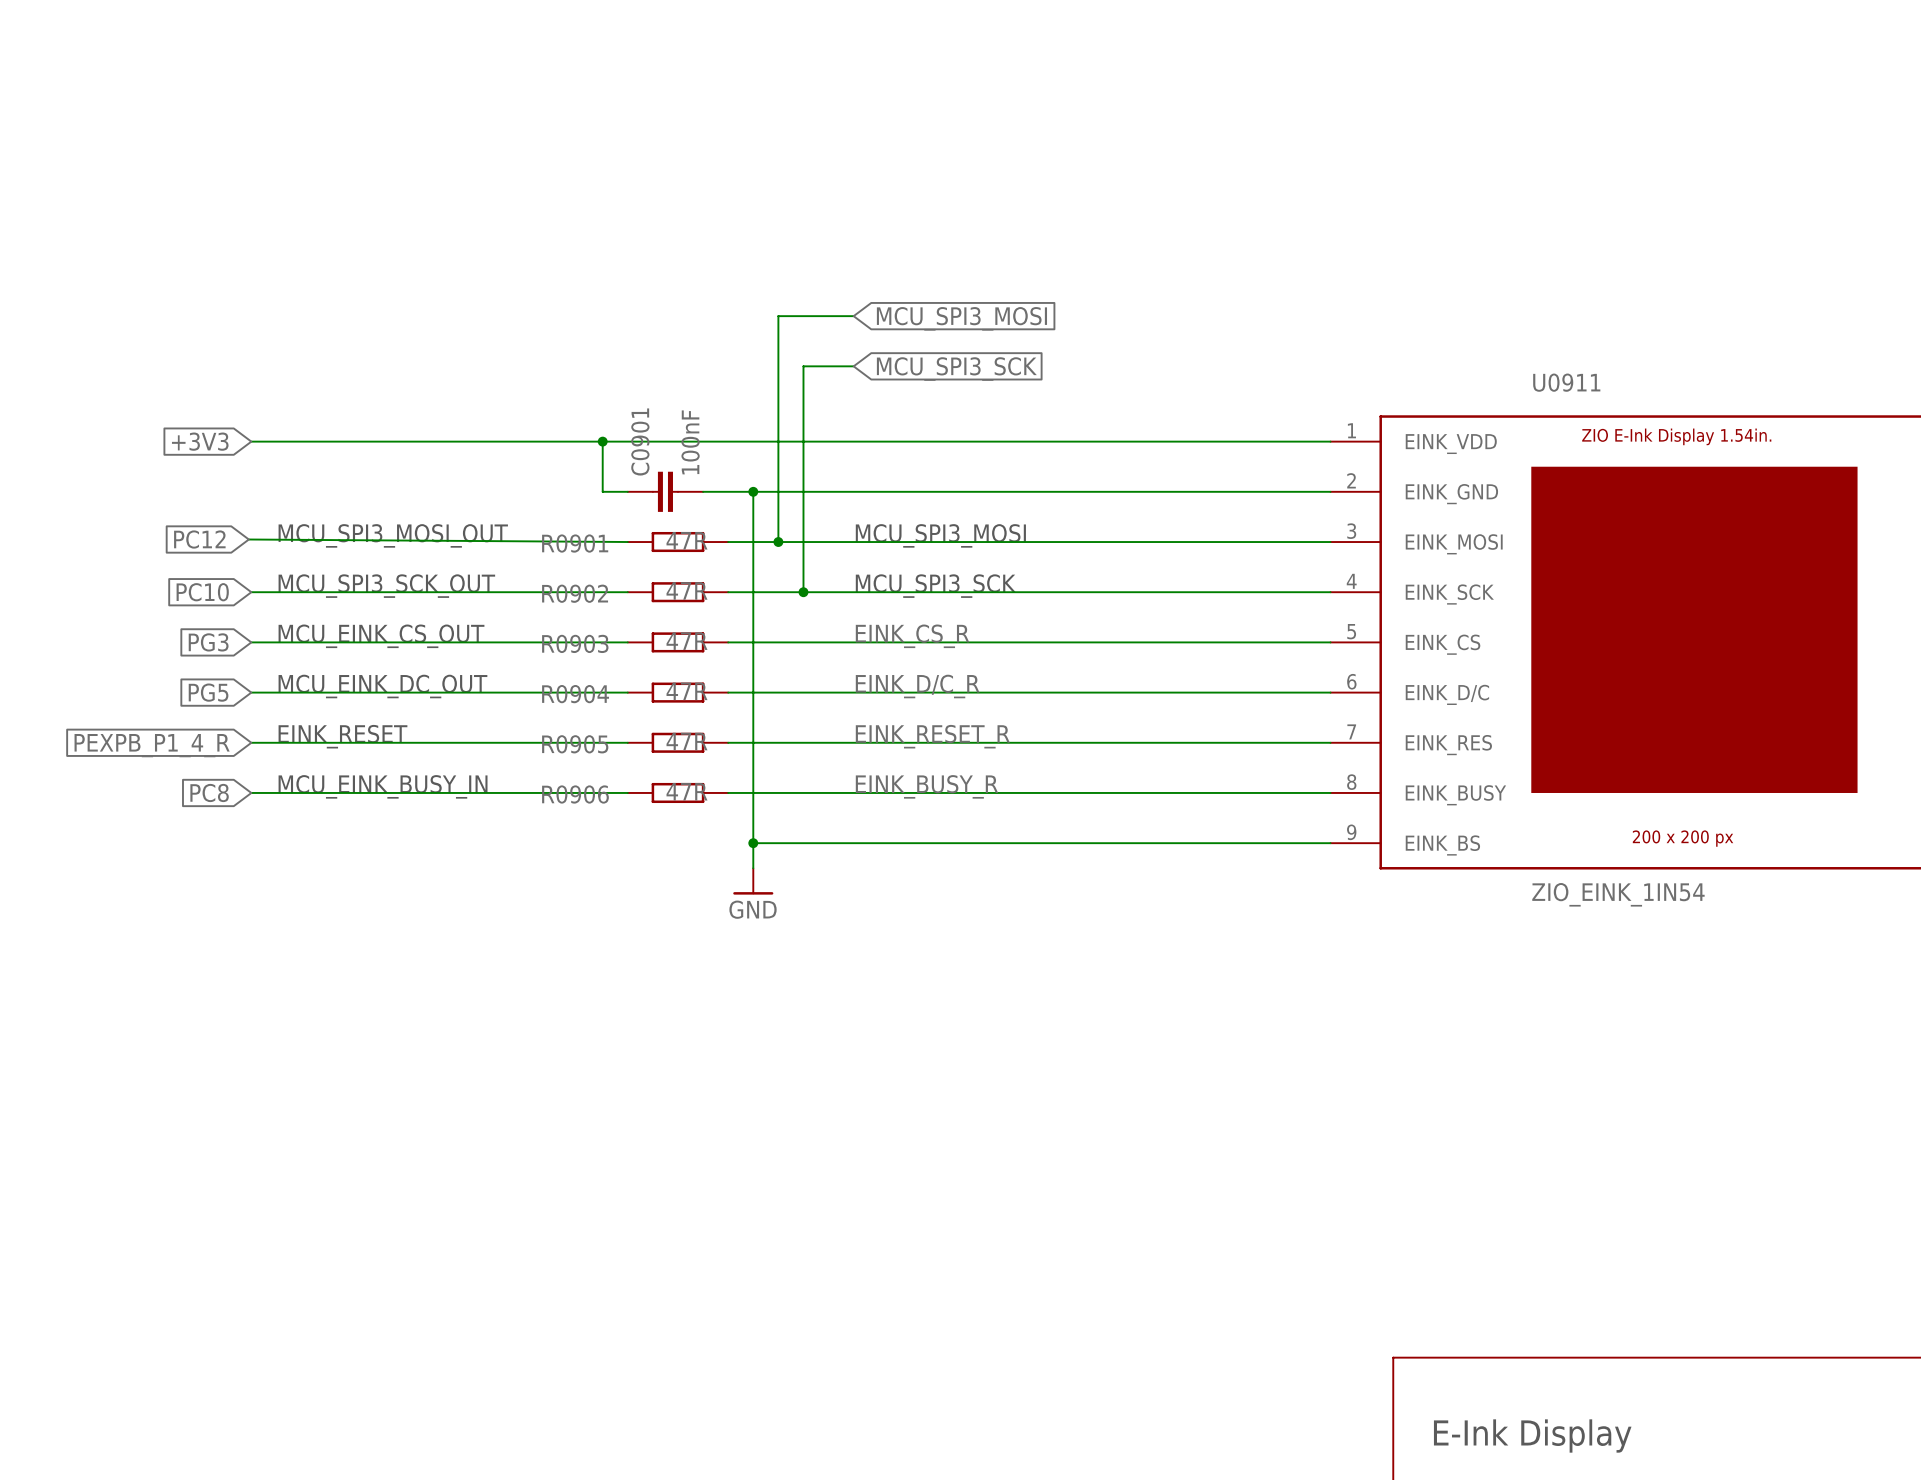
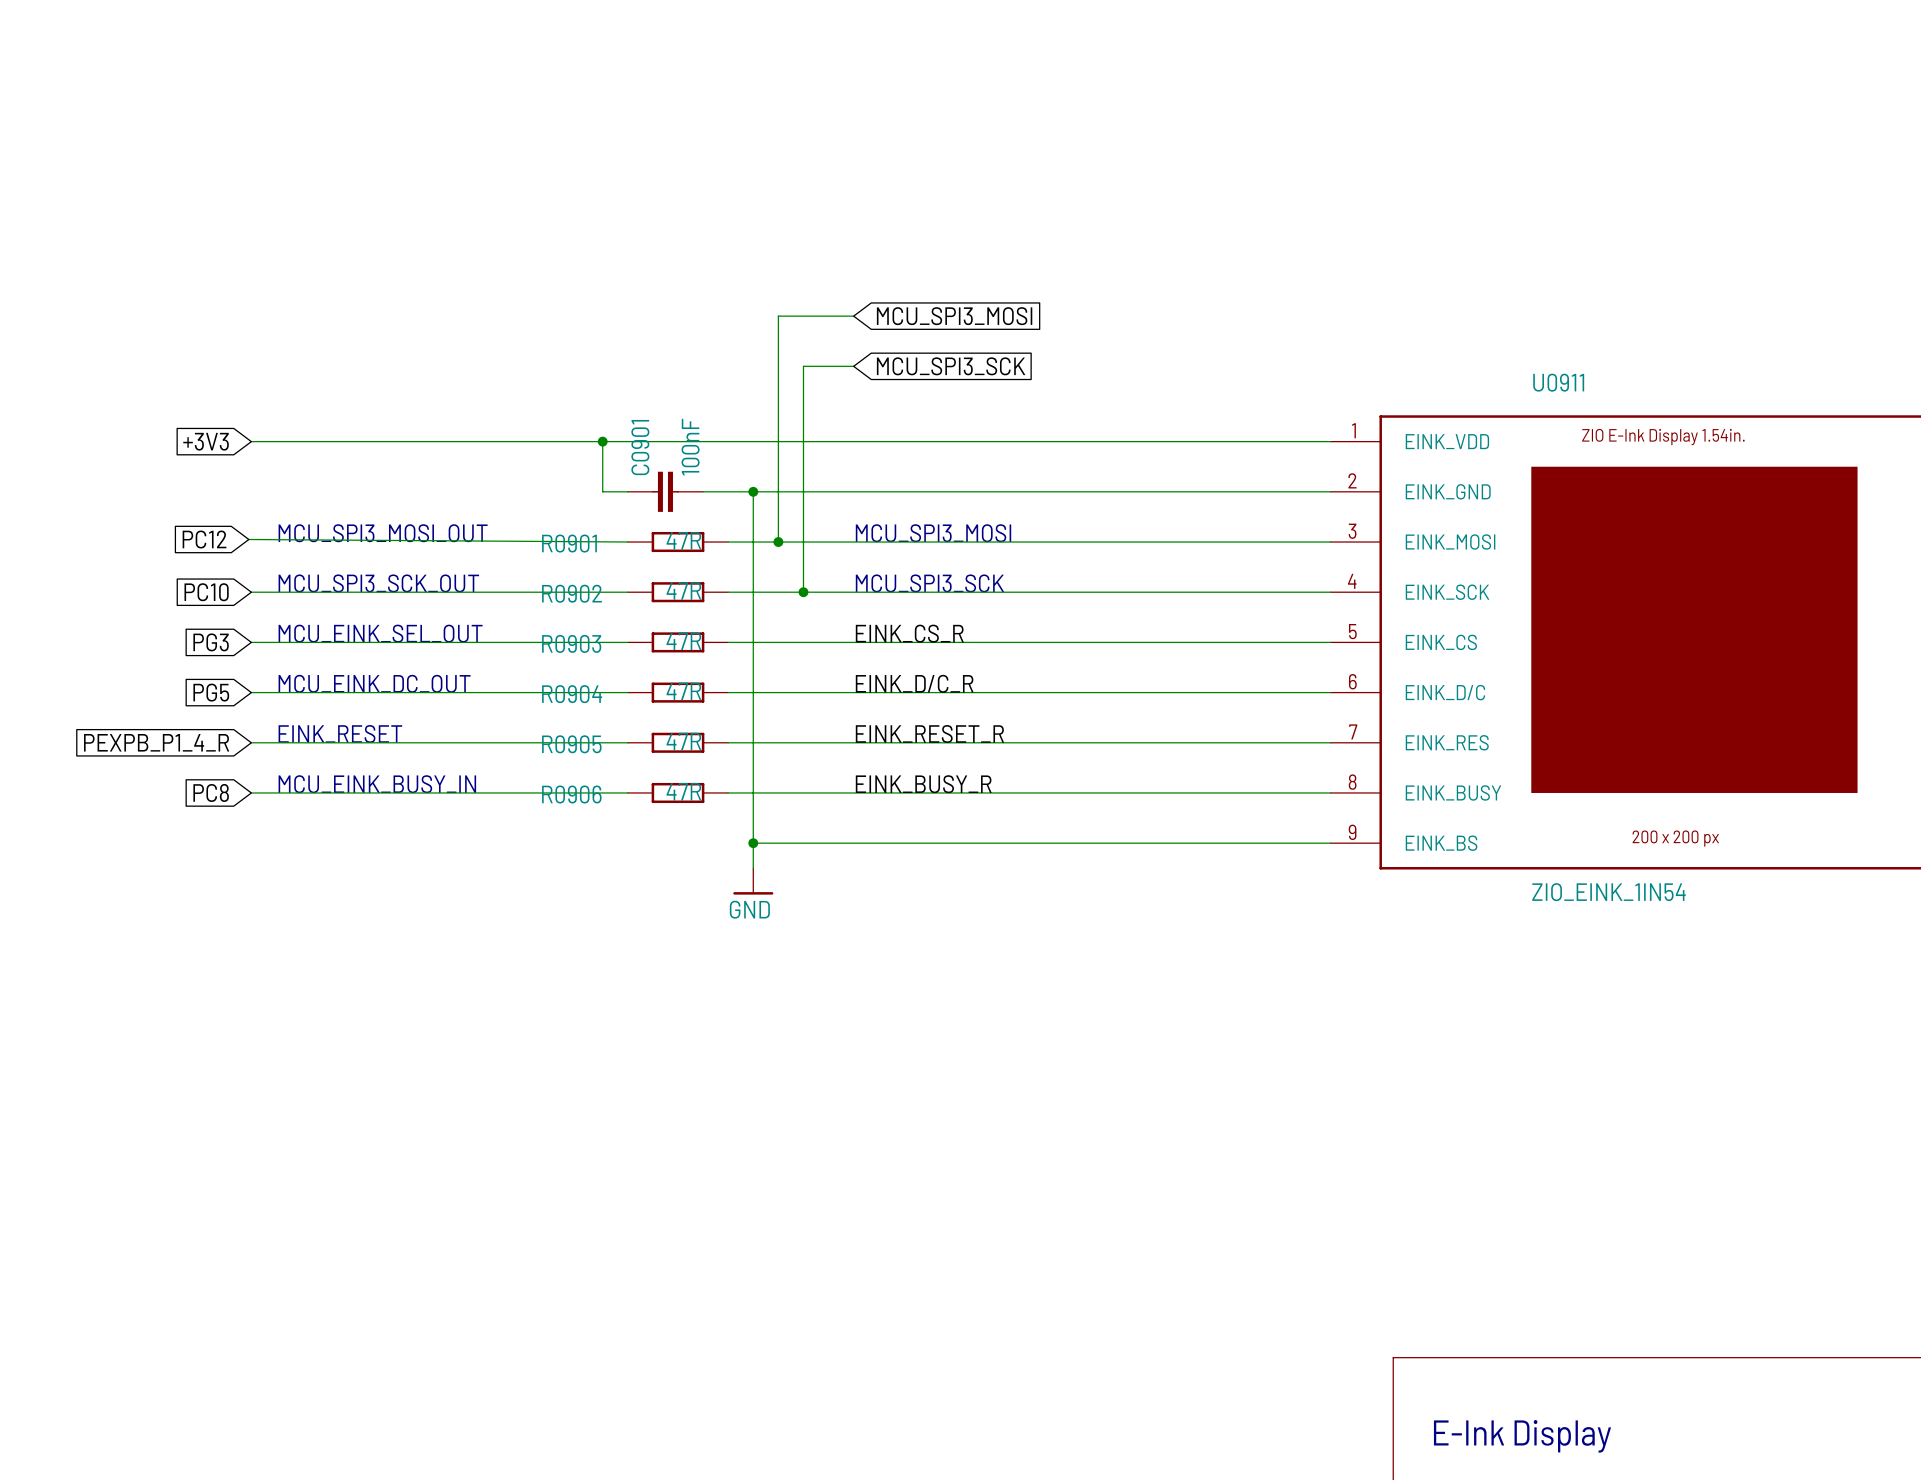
text: MCU_EINK_CS_OUT (381, 636) -> MCU_EINK_SEL_OUT (380, 633)

